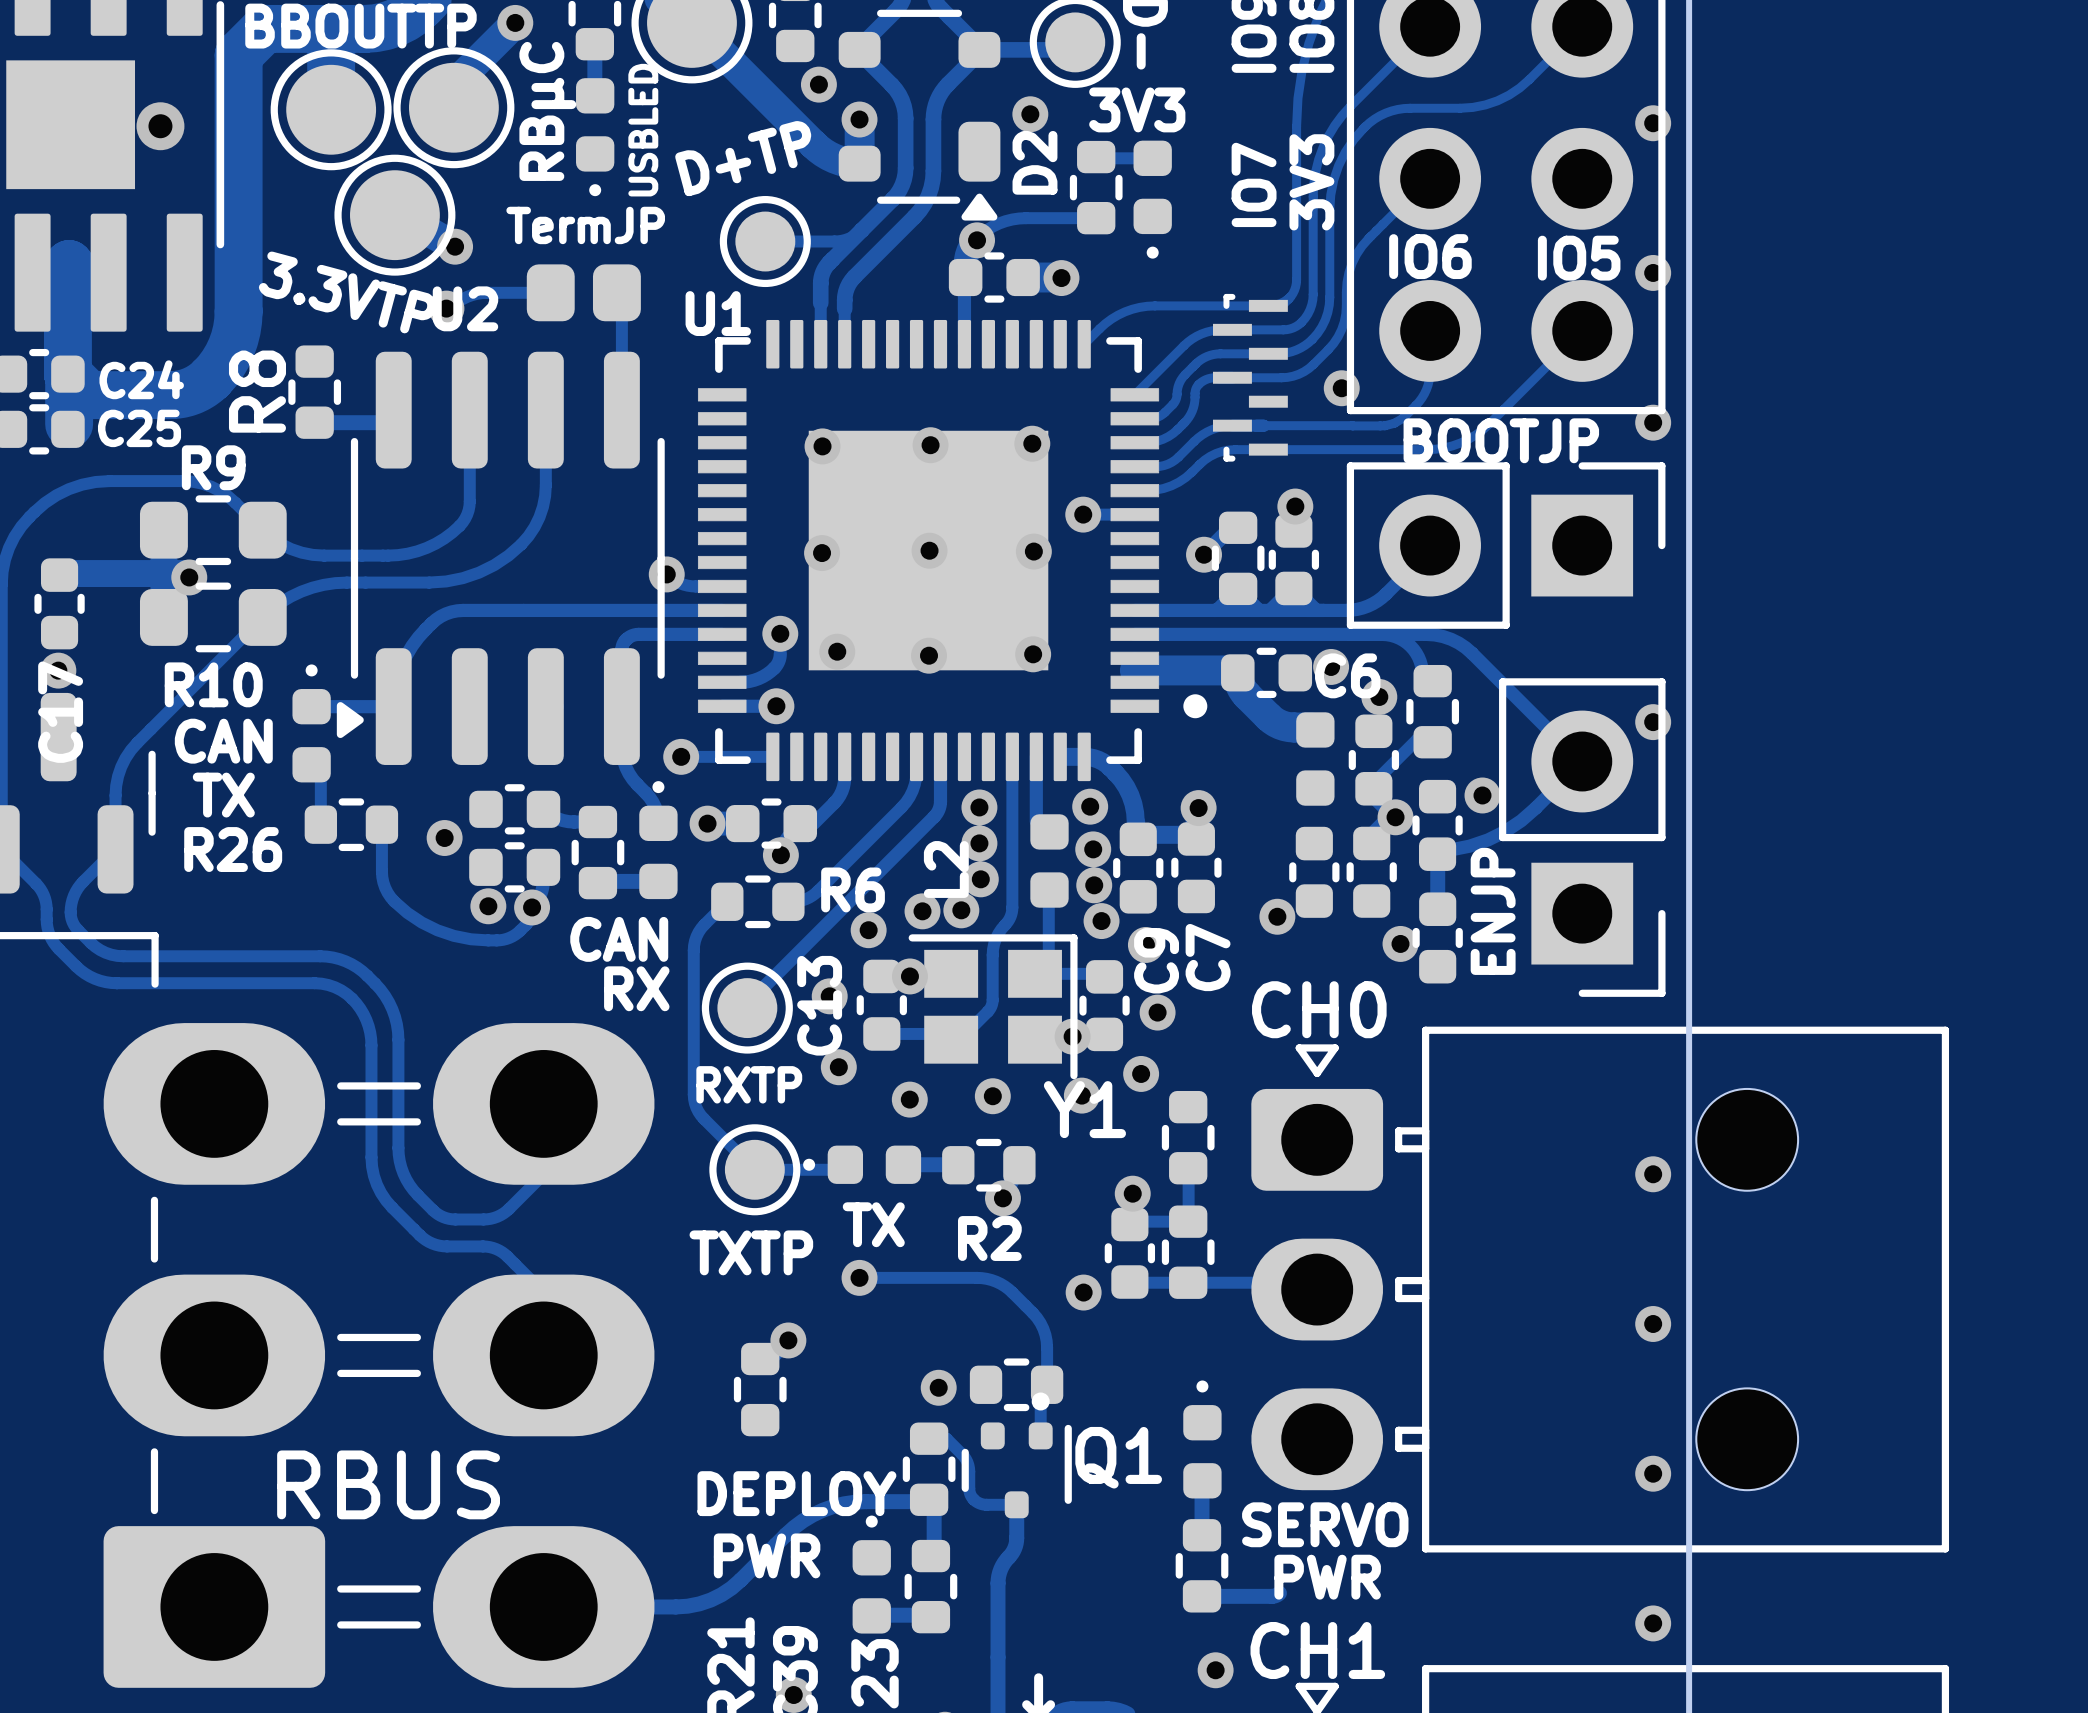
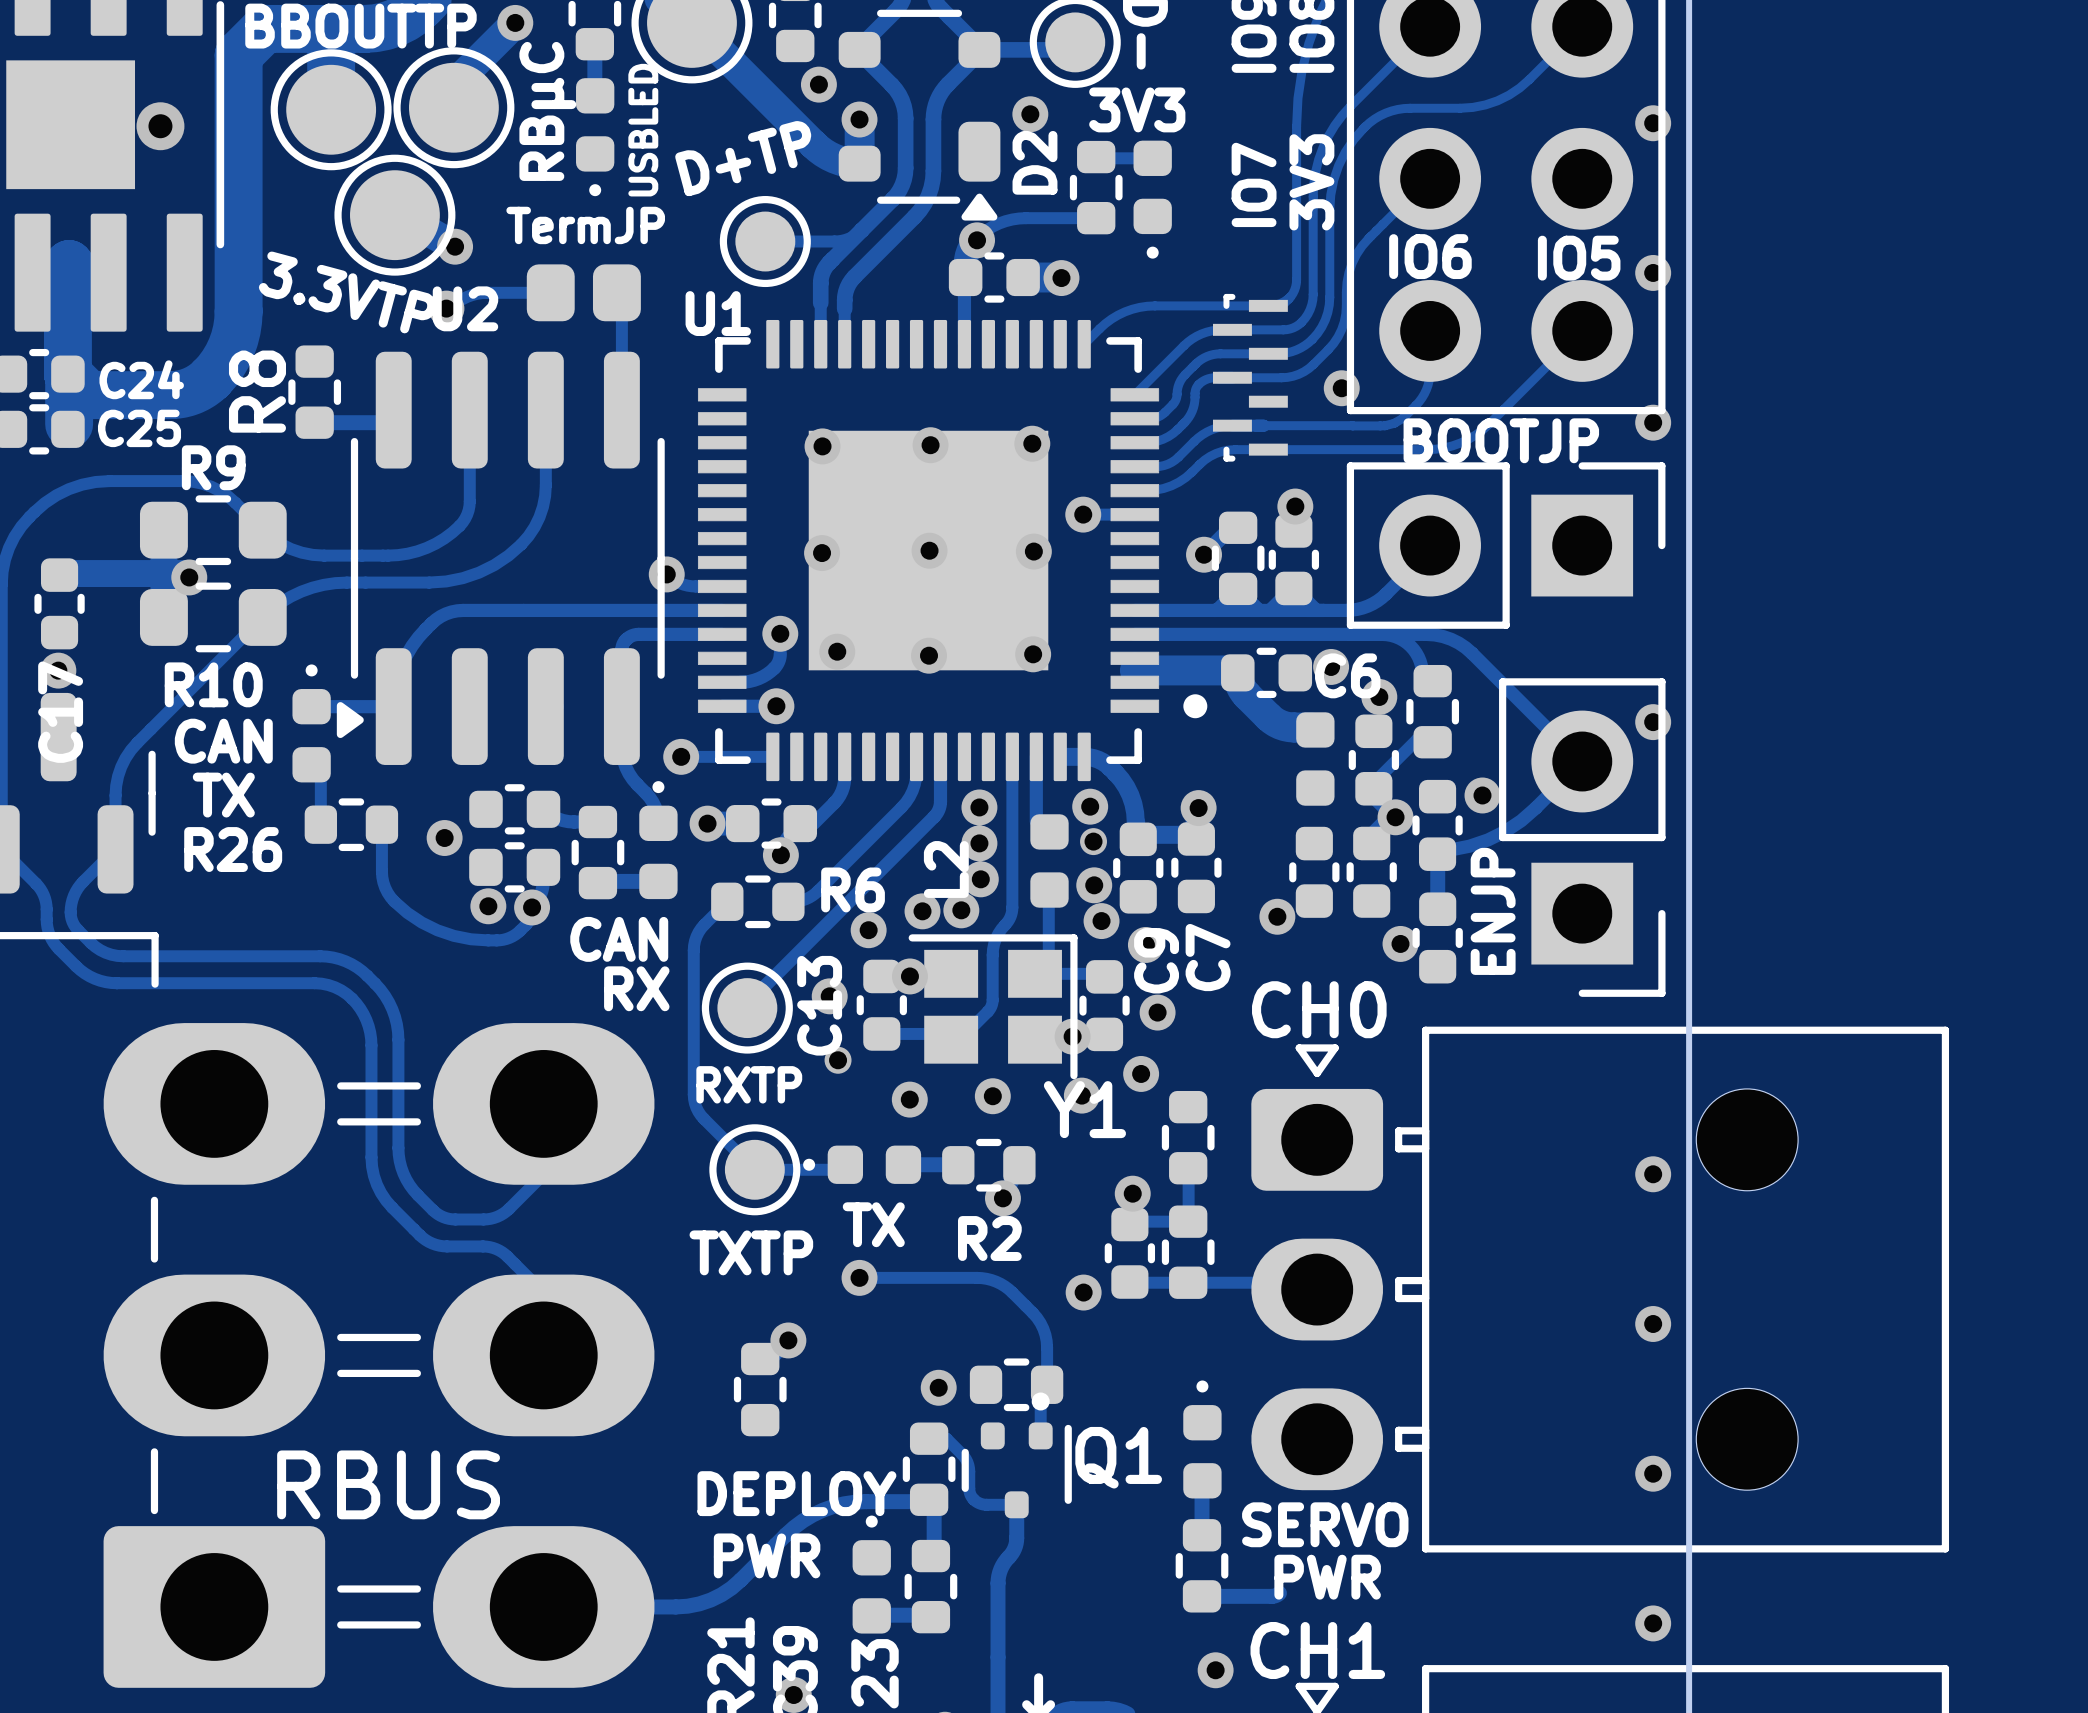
via size: [1075, 831, 1112, 868] -> [1080, 828, 1107, 856]
via size: [820, 1049, 857, 1086] -> [824, 1046, 852, 1074]

